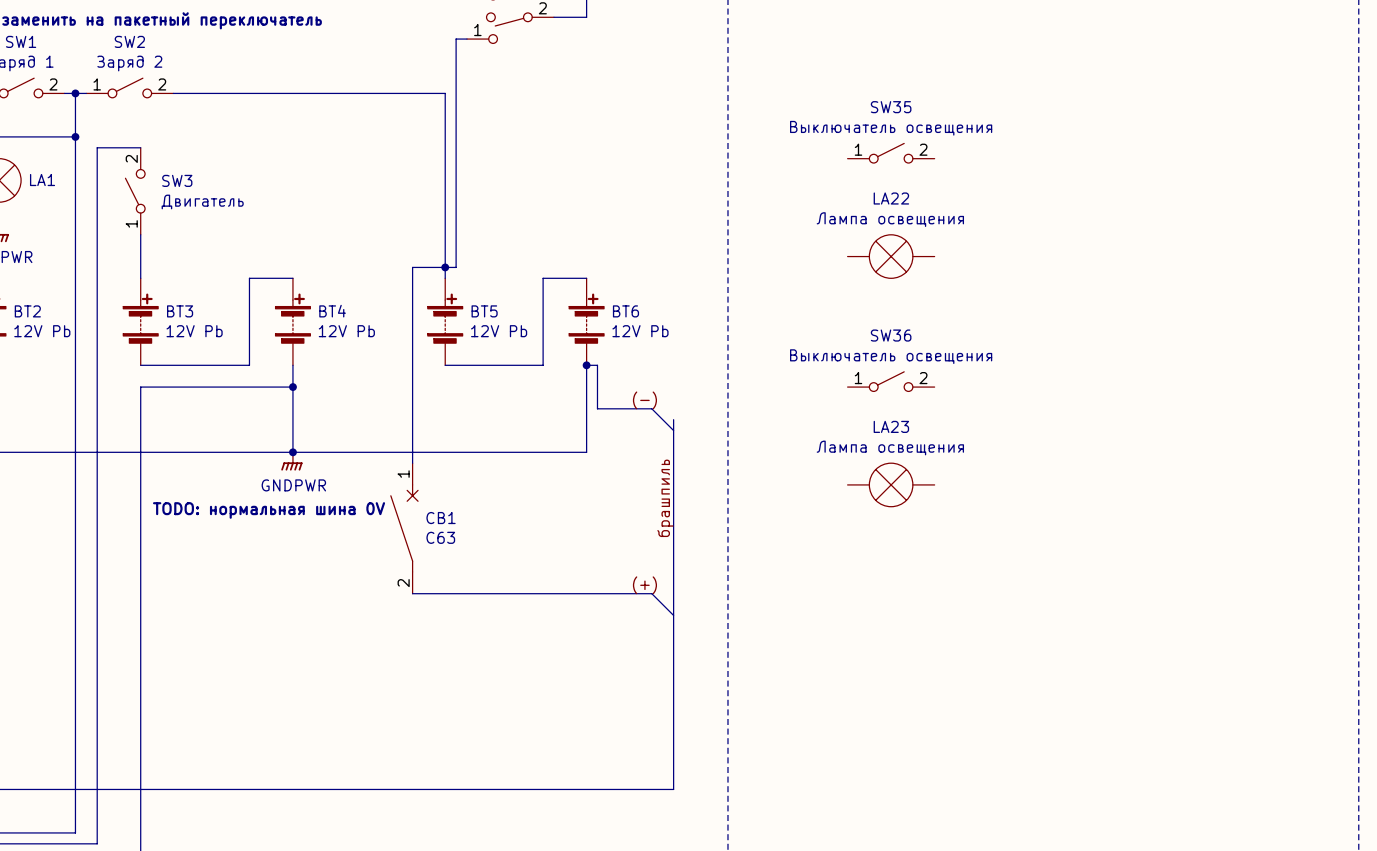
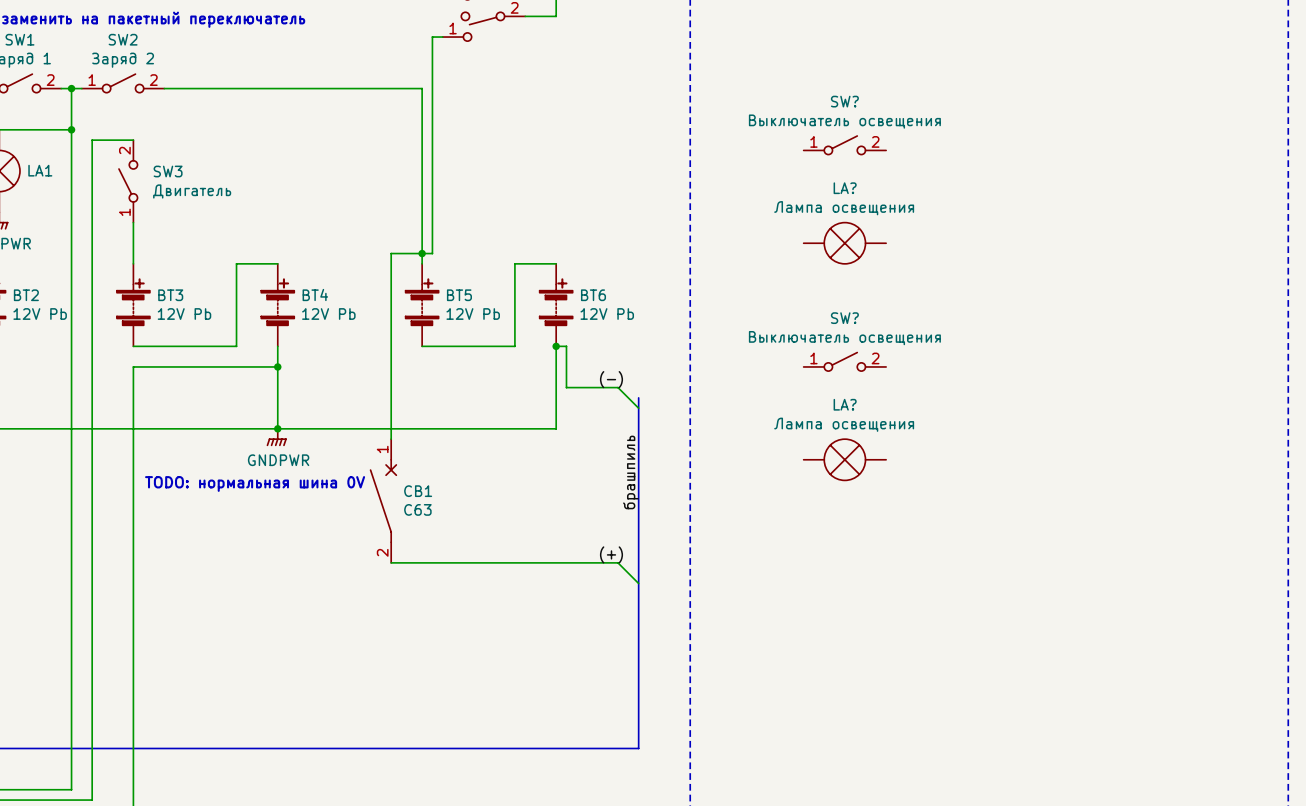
SW35 name: SW35 (891, 107) -> SW? (844, 101)
LA22 name: LA22 (891, 198) -> LA? (845, 188)
SW36 name: SW36 (891, 335) -> SW? (844, 318)
LA23 name: LA23 (891, 426) -> LA? (845, 404)

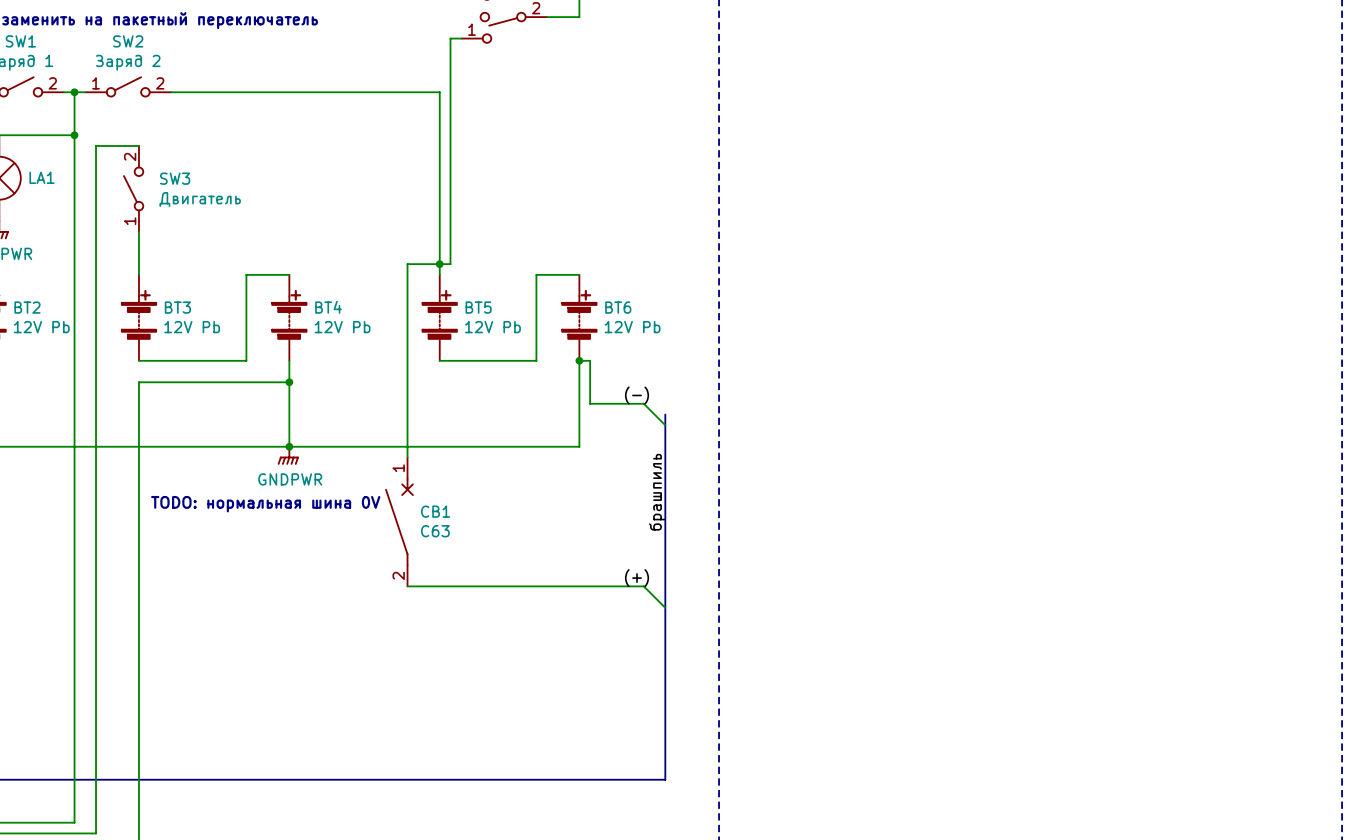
SW?: Выключатель освещения (844, 145) -> none
LA?: Лампа освещения (844, 243) -> none
SW?: Выключатель освещения (844, 361) -> none
LA?: Лампа освещения (844, 459) -> none

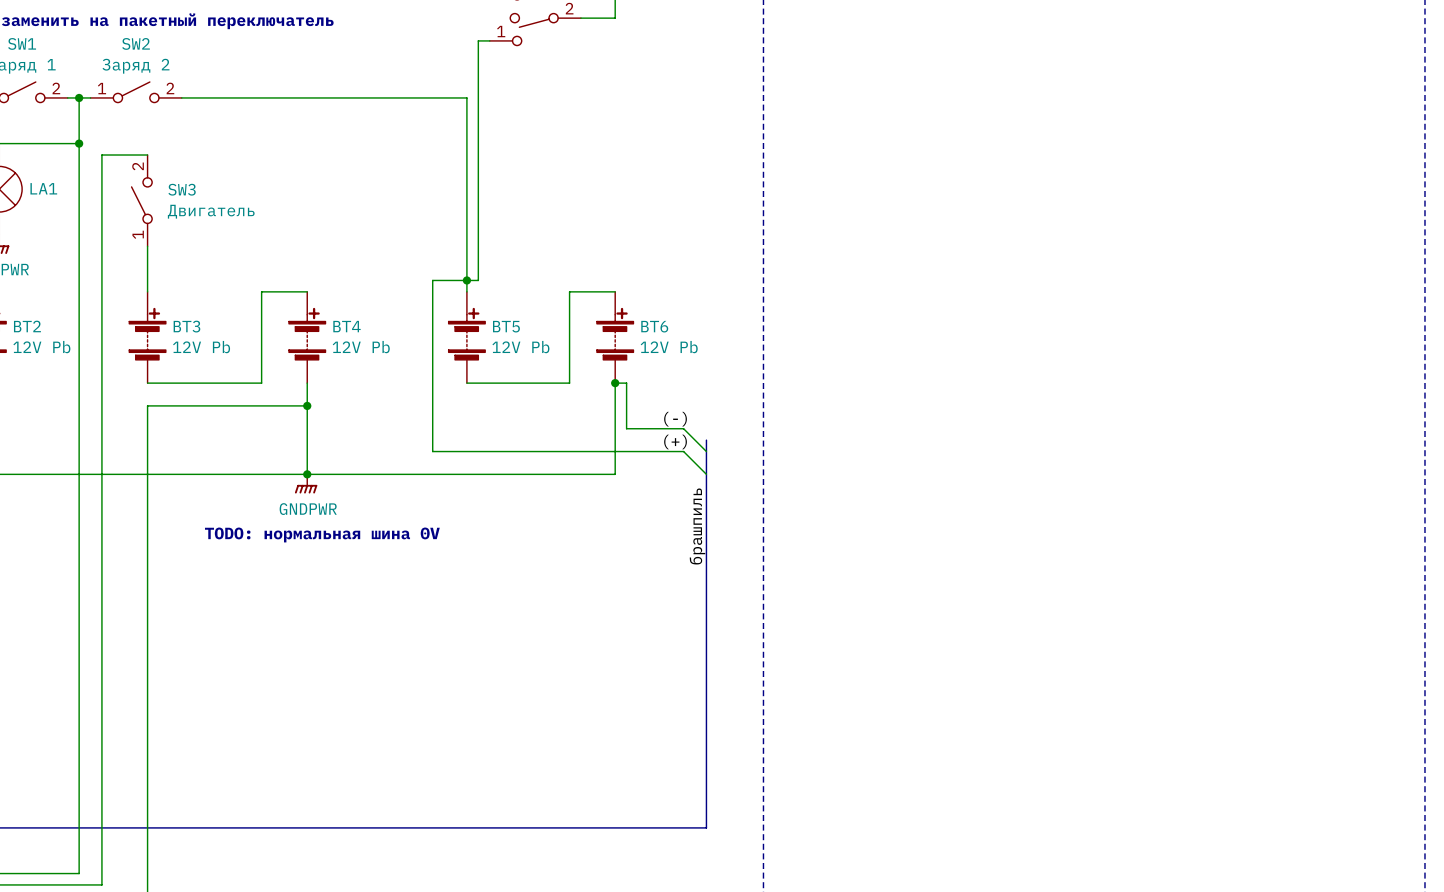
wire: (407, 425) (407, 457) -> (432, 451) (683, 451) (706, 474)
text position: TODO: нормальная шина 0V (265, 504) -> TODO: нормальная шина 0V (322, 534)
CB1: C63 (399, 521) -> none
label position: (+) (637, 578) -> (+) (675, 441)
wire: (407, 586) (643, 586) (665, 607) -> none

